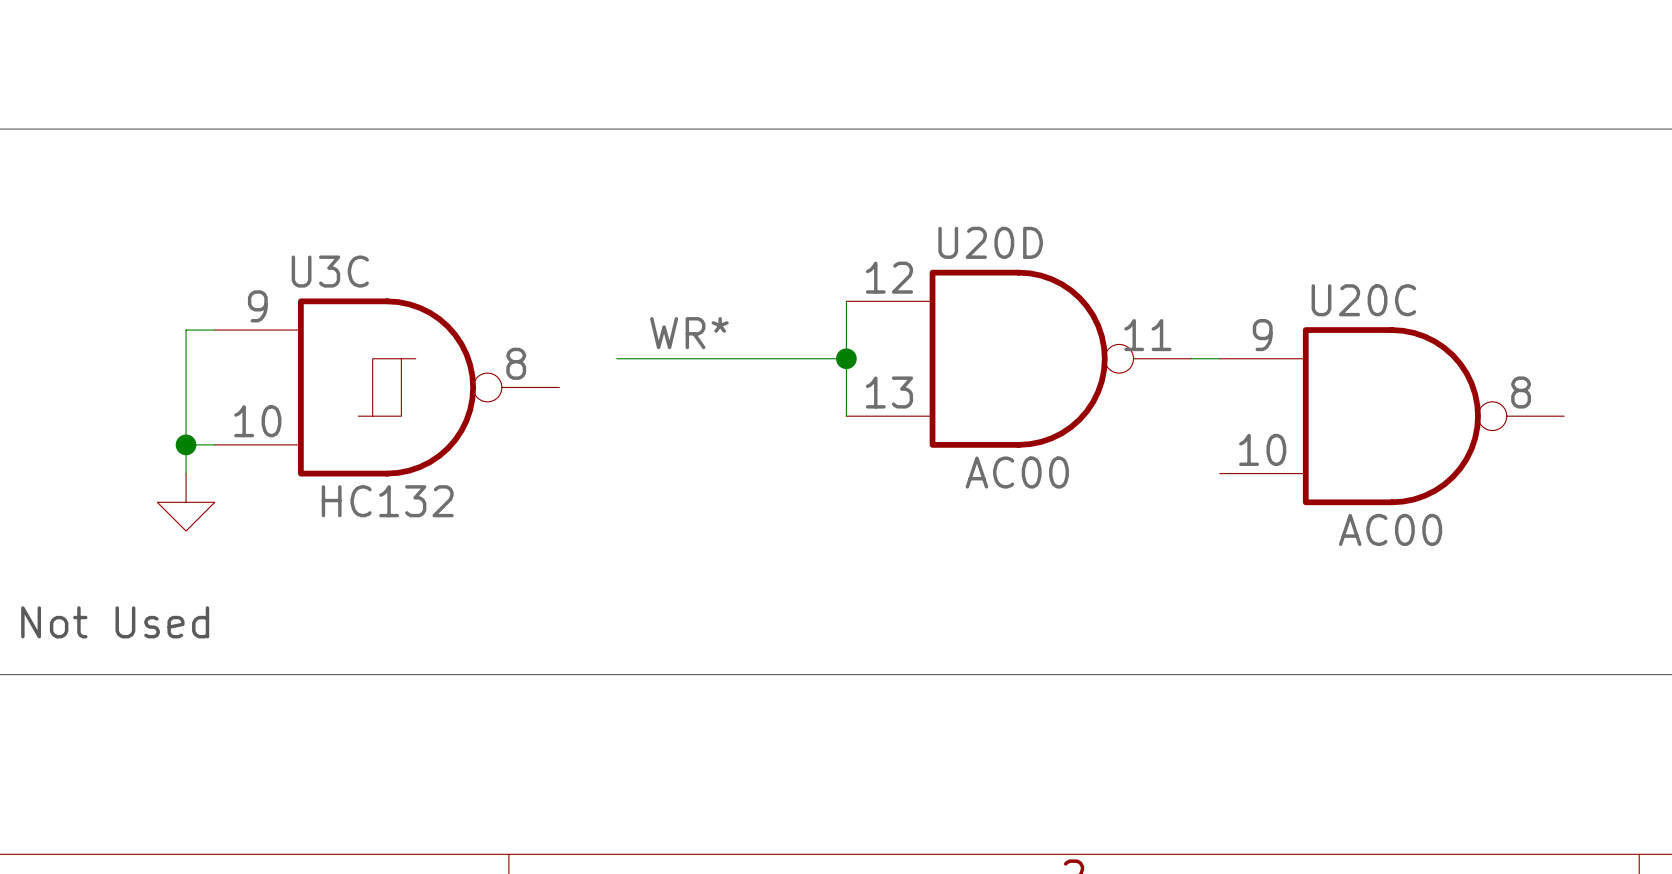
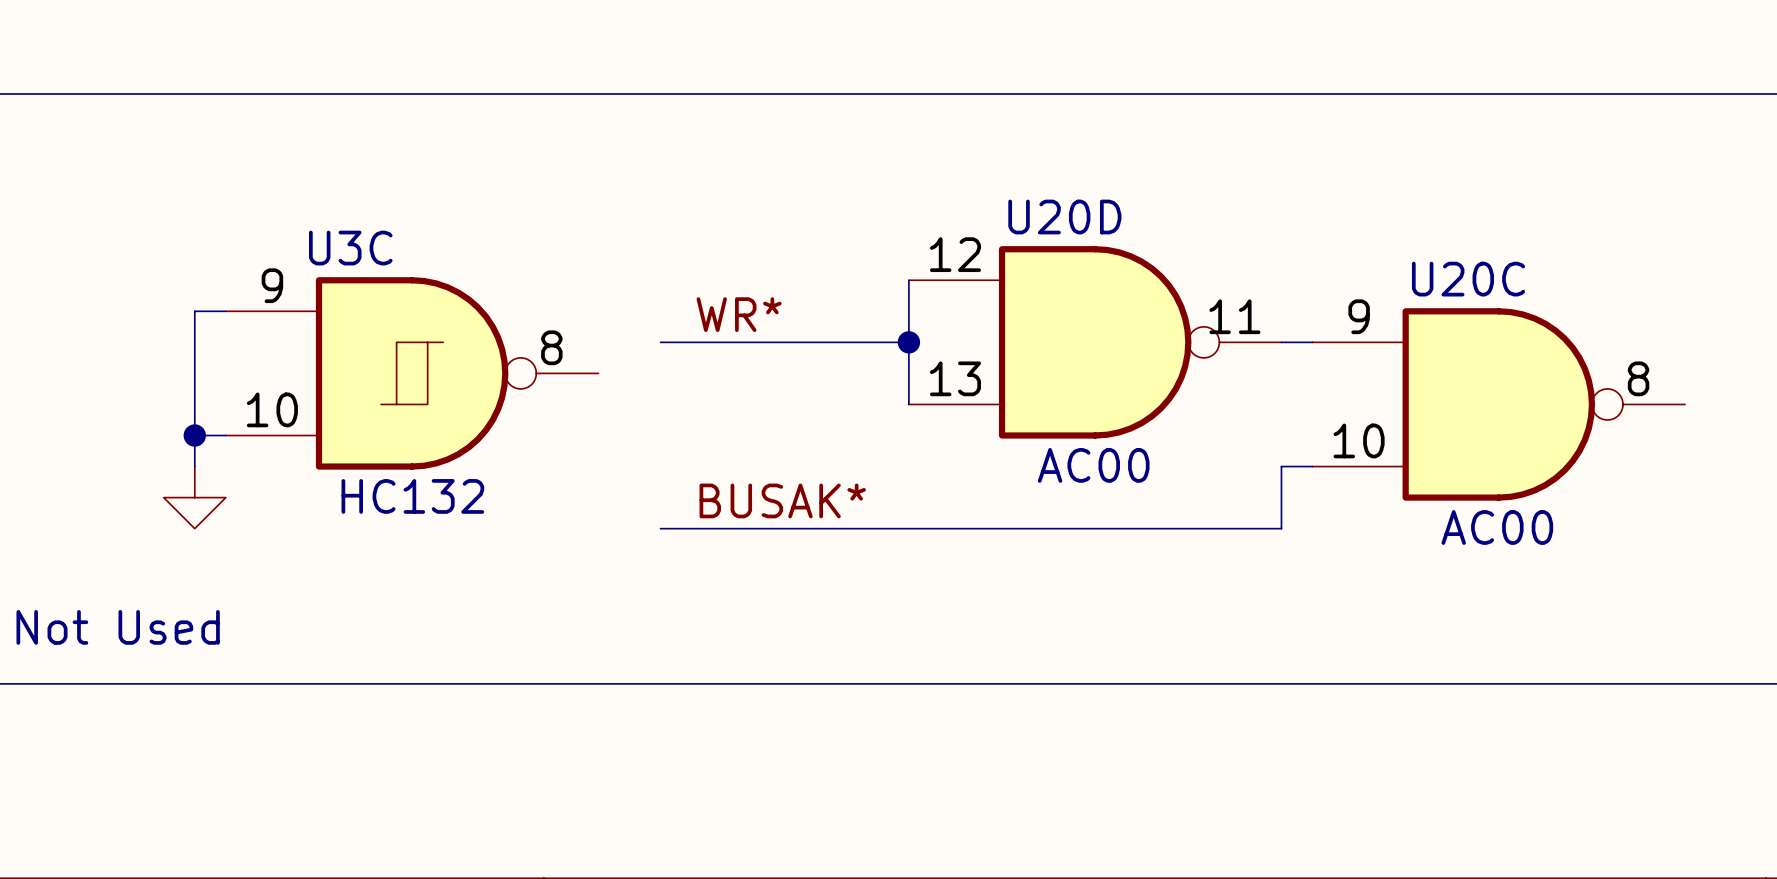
wire: none -> (1312, 466) (1281, 466) (1281, 528) (660, 528)
label: none -> BUSAK* (782, 500)

